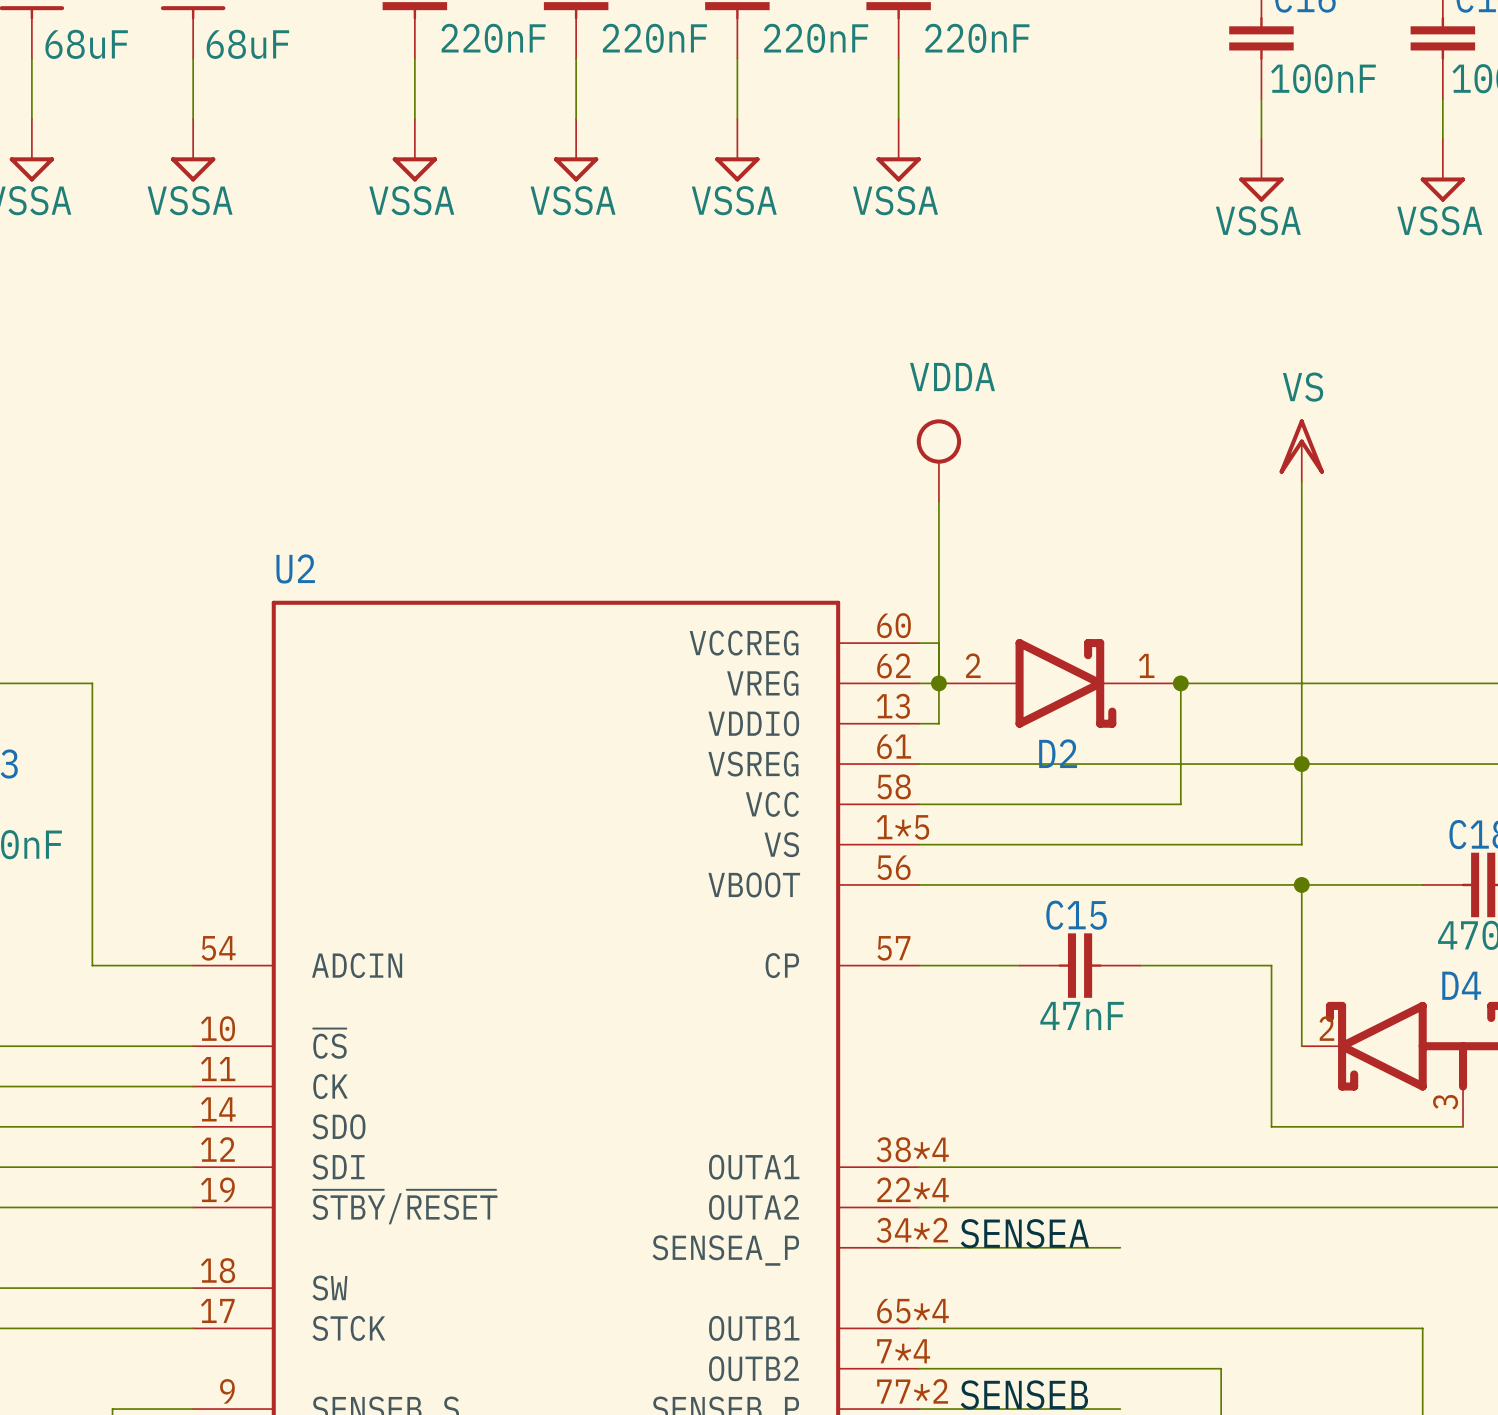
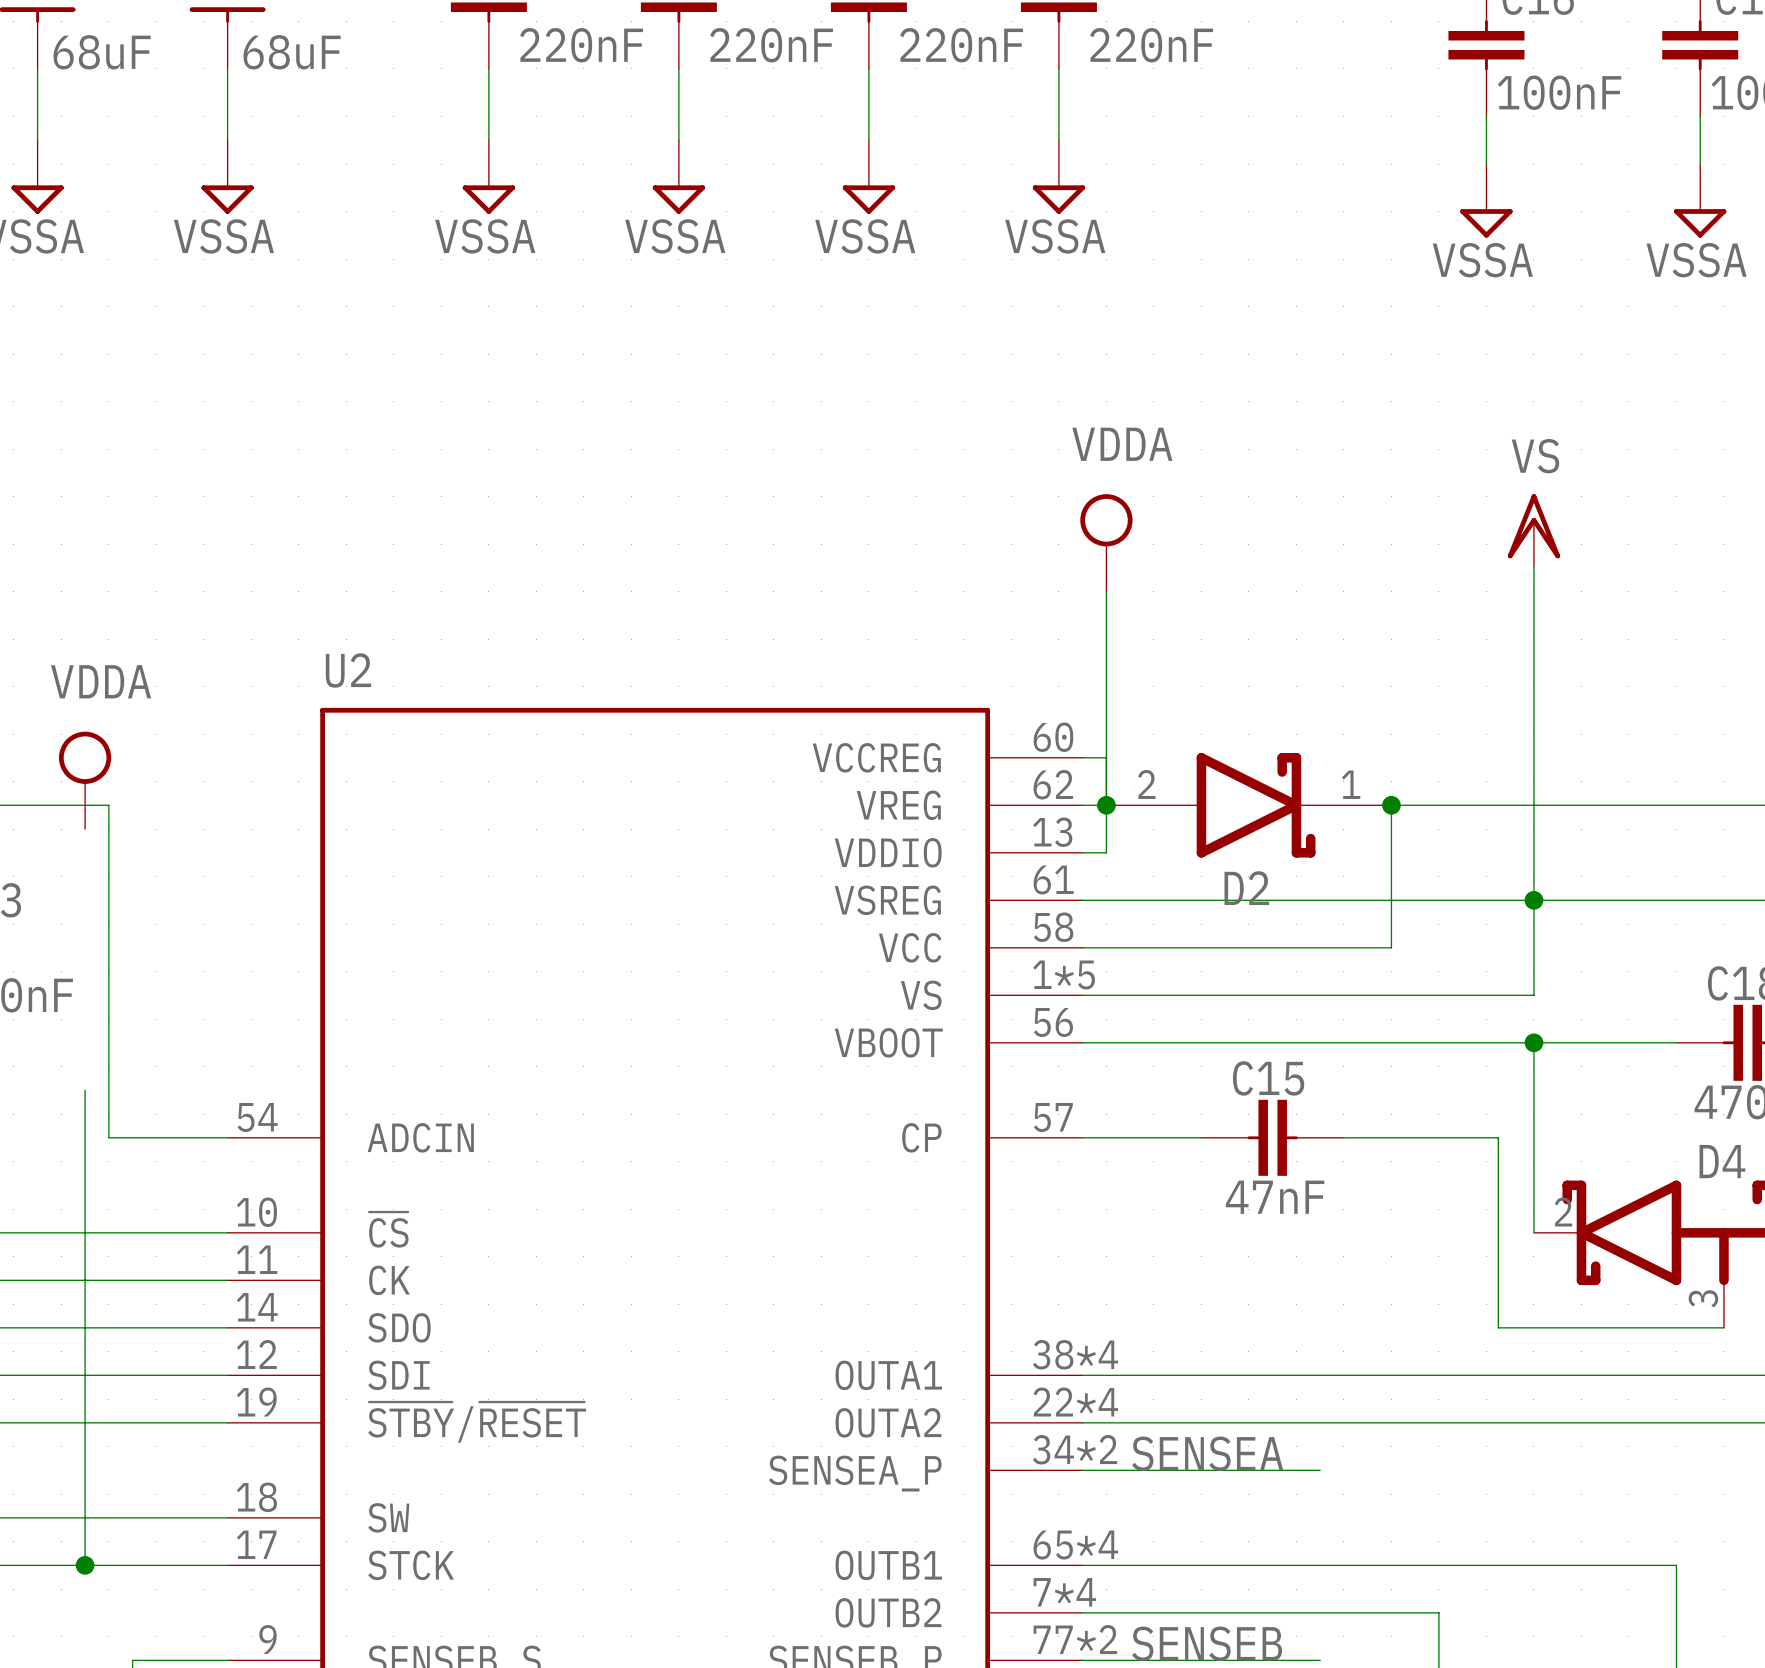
power symbol: none -> VDDA (85, 780)
wire: none -> (85, 1090) (85, 1565)
junction: none -> (85, 1565)

